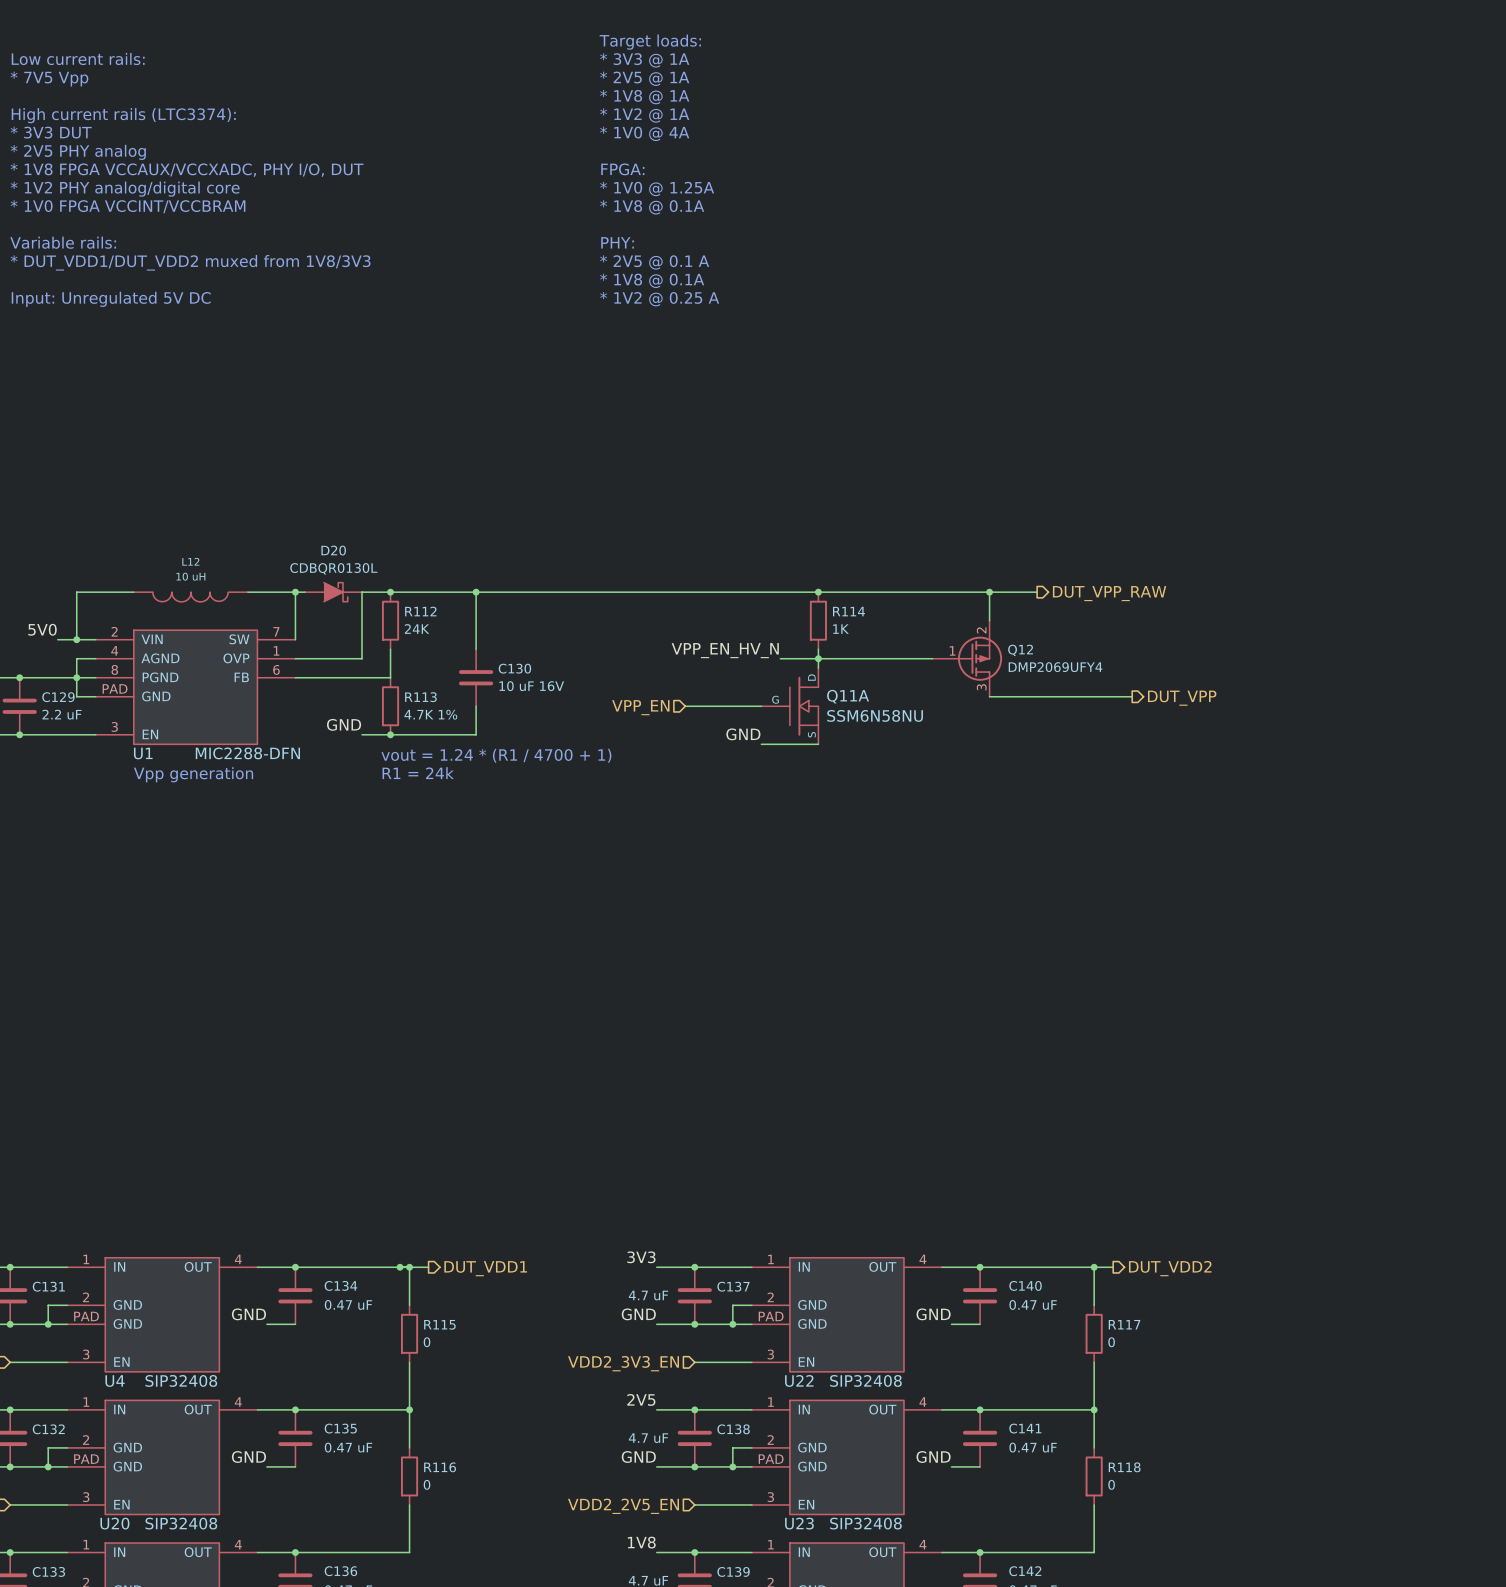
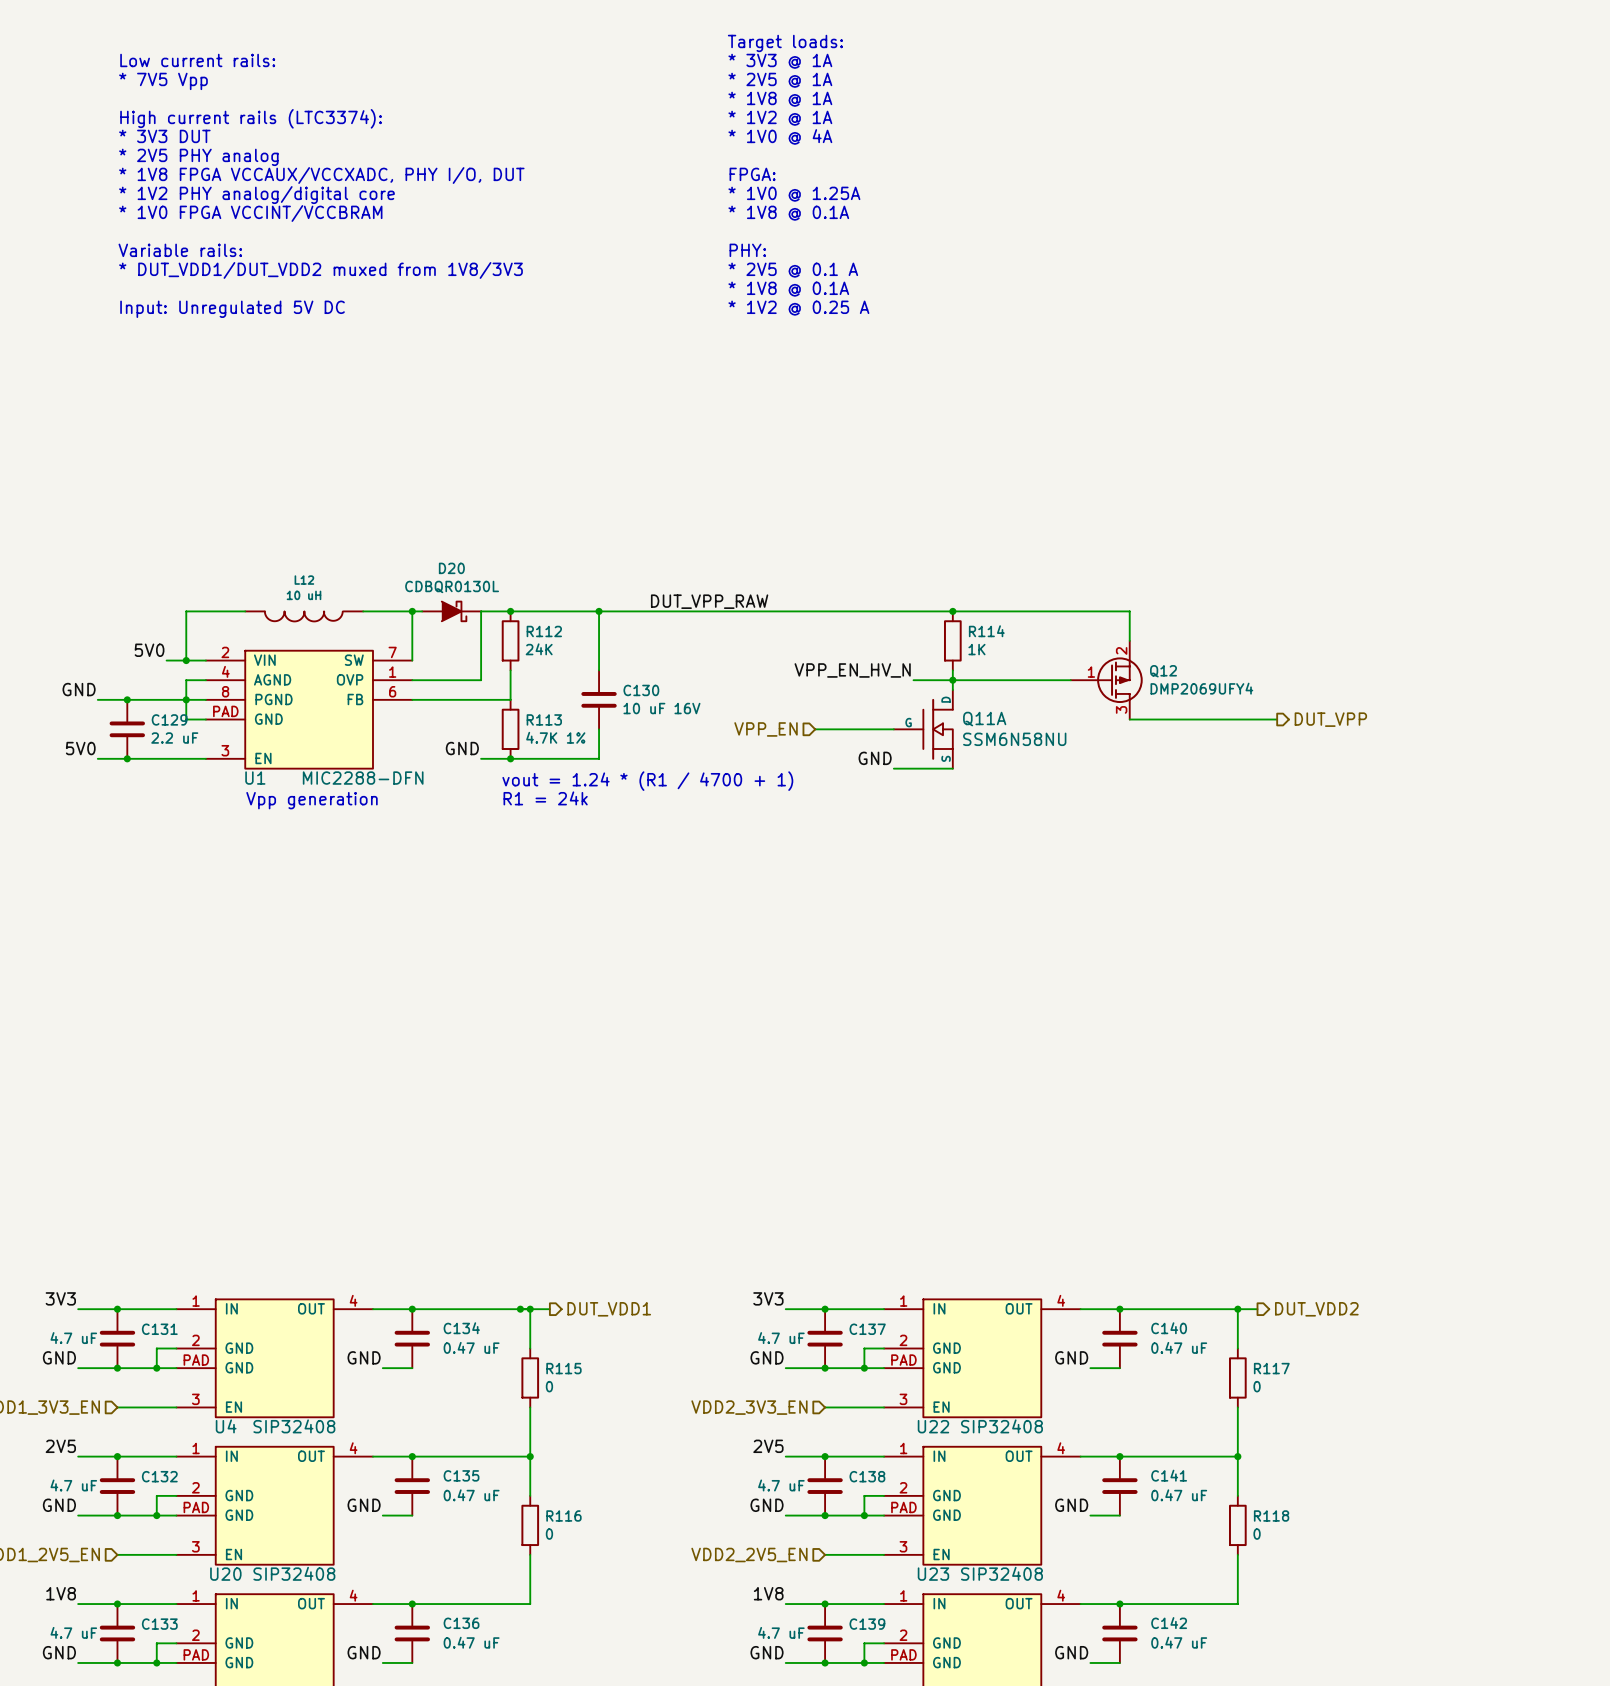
label: none -> DUT_VPP_RAW (709, 601)
wire: (989, 592) (1037, 592) -> none
junction: (989, 592) -> none
hierarchical label: DUT_VPP_RAW (1109, 593) -> none

